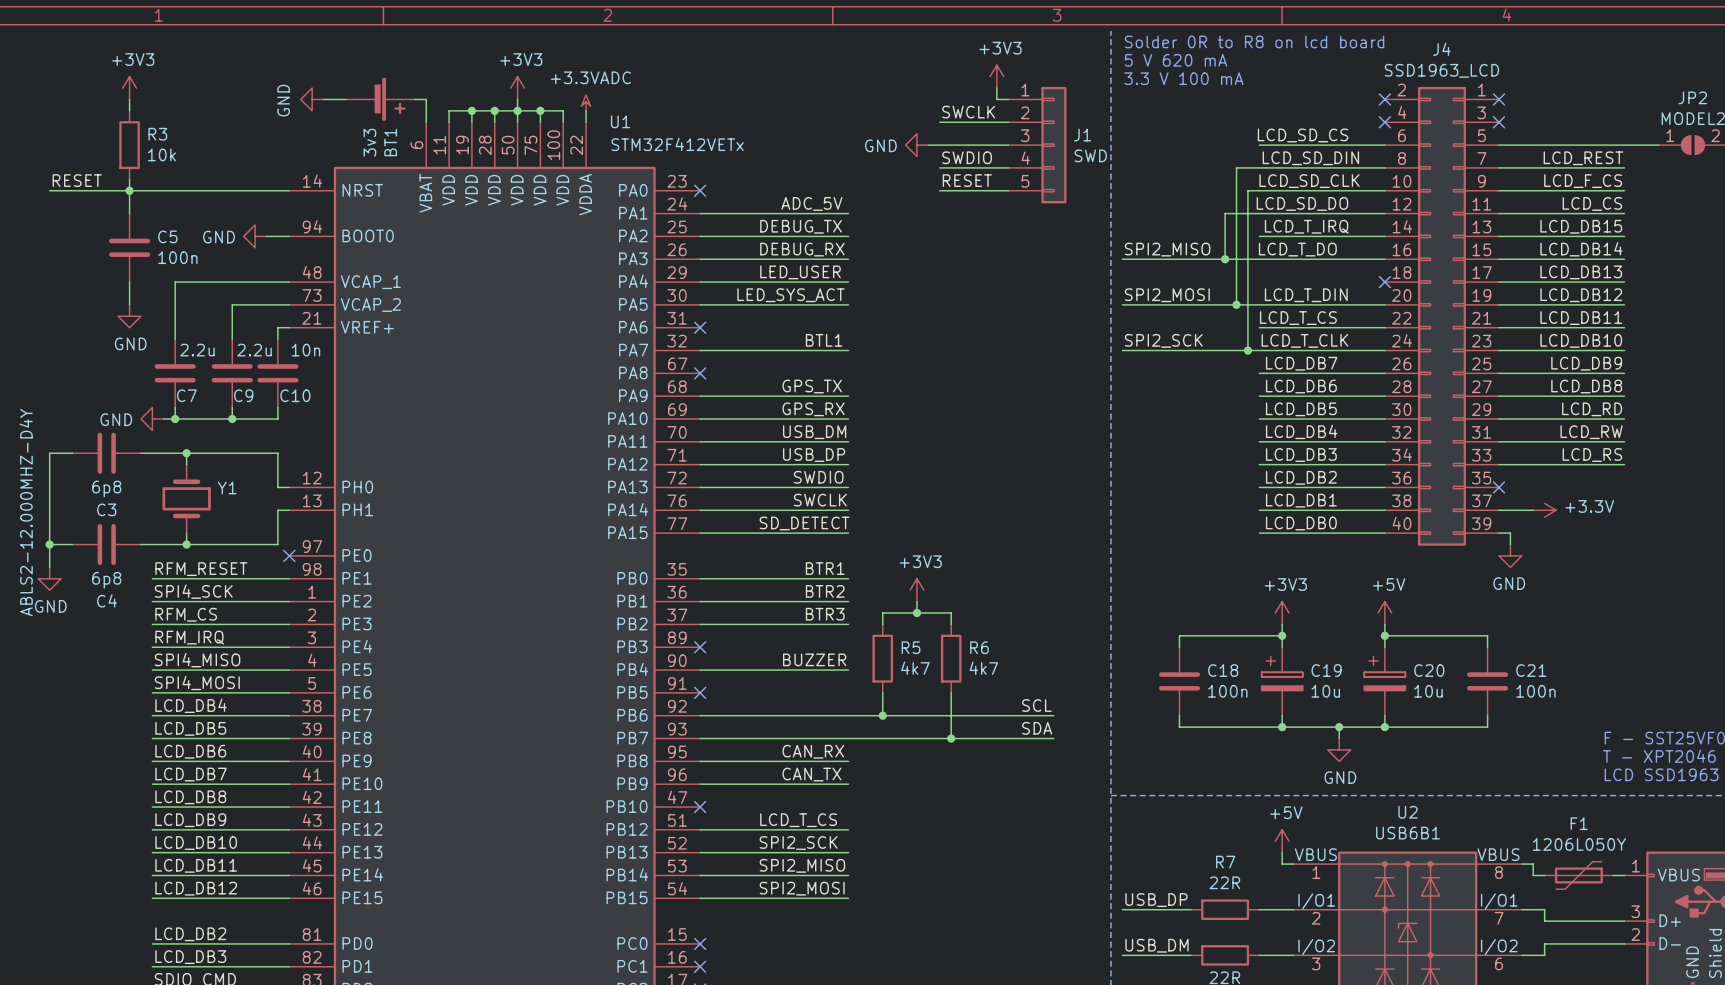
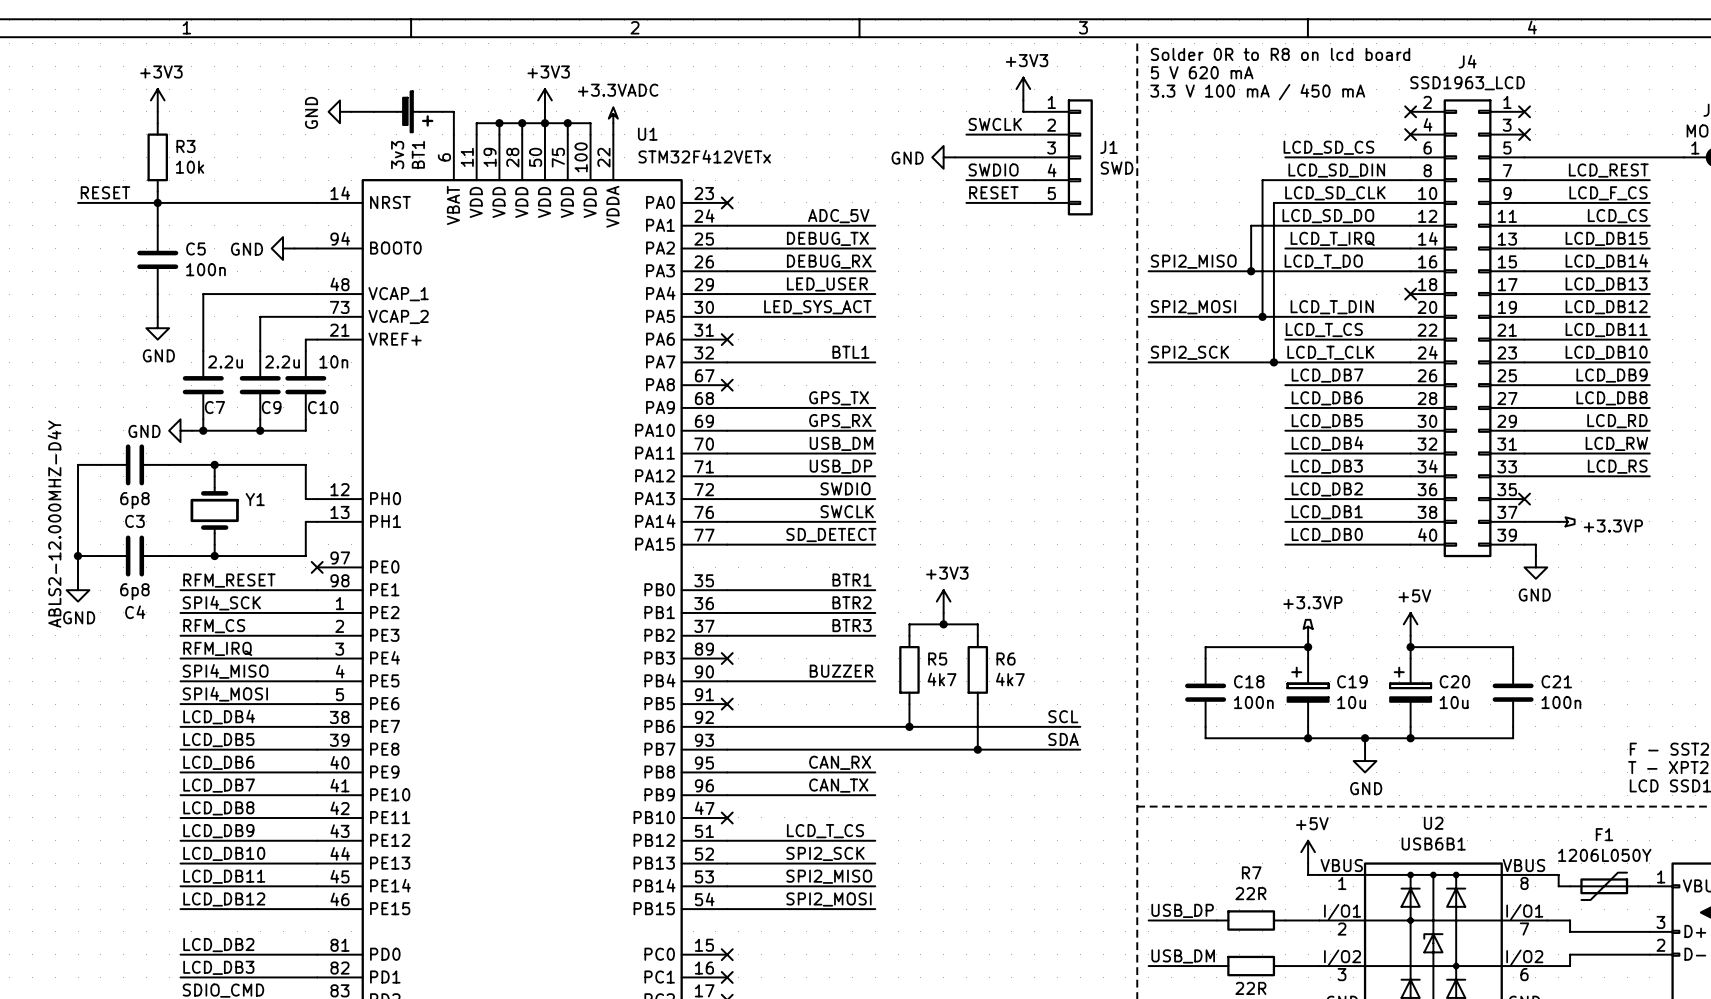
text: 3.3 V 100 mA (1183, 78) -> 3.3 V 100 mA / 450 mA (1257, 92)
power symbol: +3.3V (1544, 510) -> +3.3VP (1566, 521)
power symbol: +3V3 (1282, 613) -> +3.3VP (1308, 627)

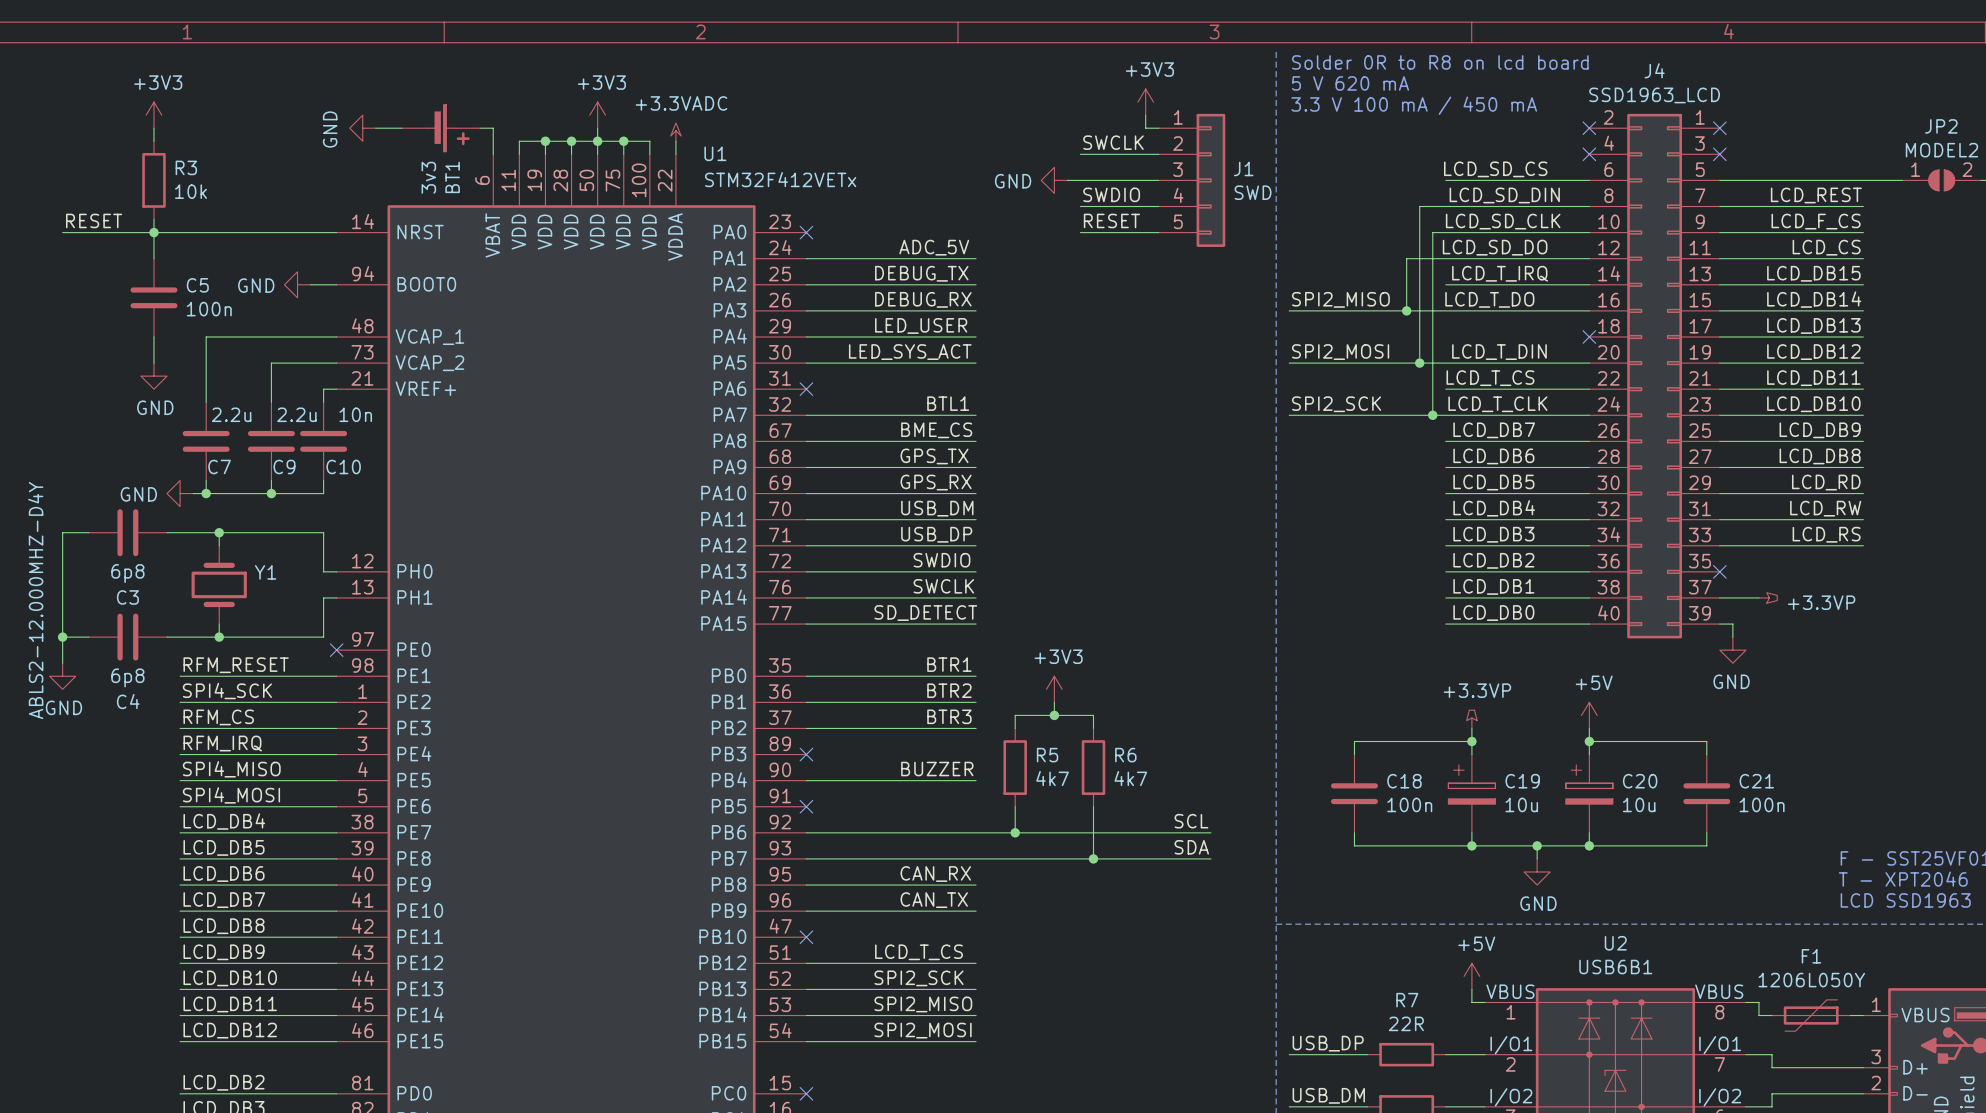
label: none -> BME_CS (936, 430)
wire: none -> (806, 441) (976, 441)
no-connect mark: (727, 385) -> none

